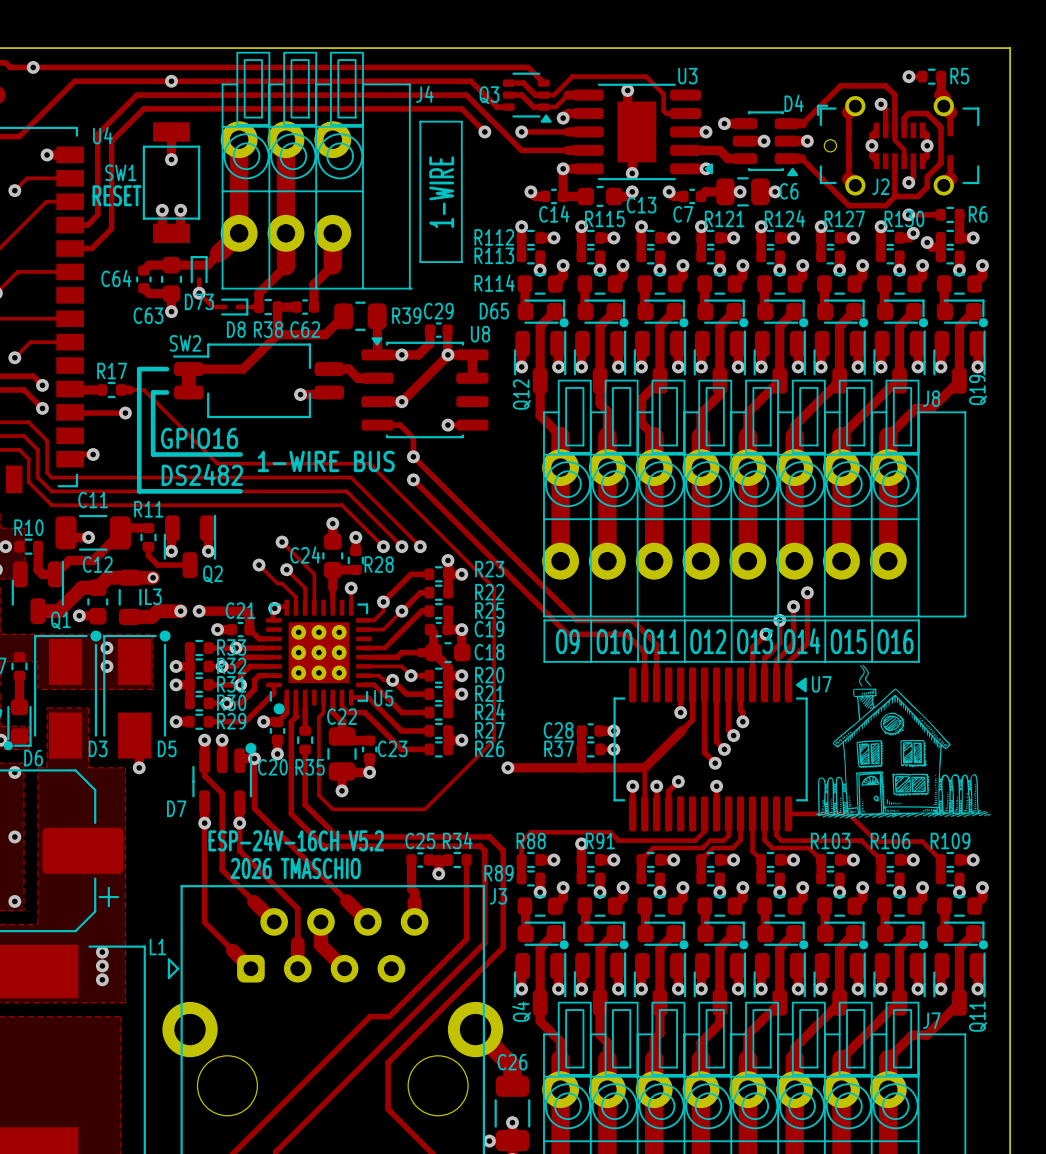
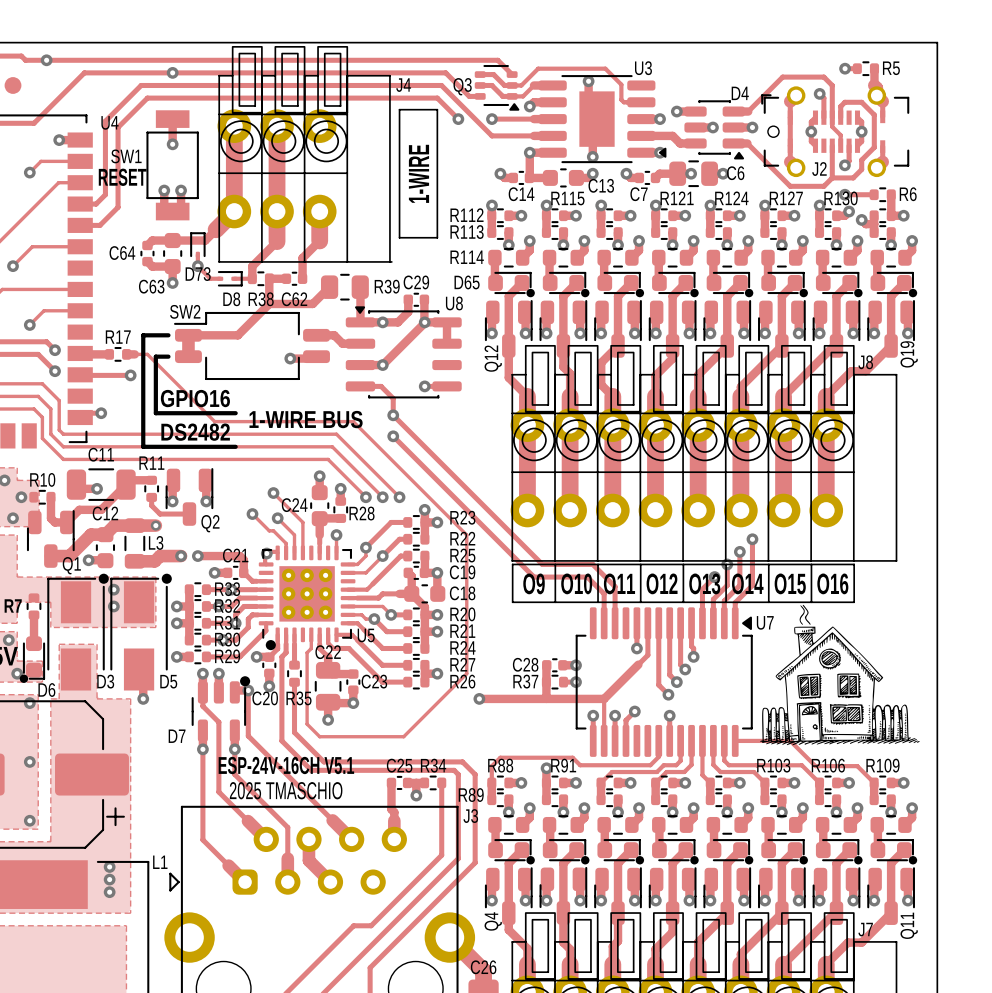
text: ESP-24V-16CH V5.2 (296, 840) -> ESP-24V-16CH V5.1 (286, 765)
text: 2026 TMASCHIO (295, 868) -> 2025 TMASCHIO (286, 790)

